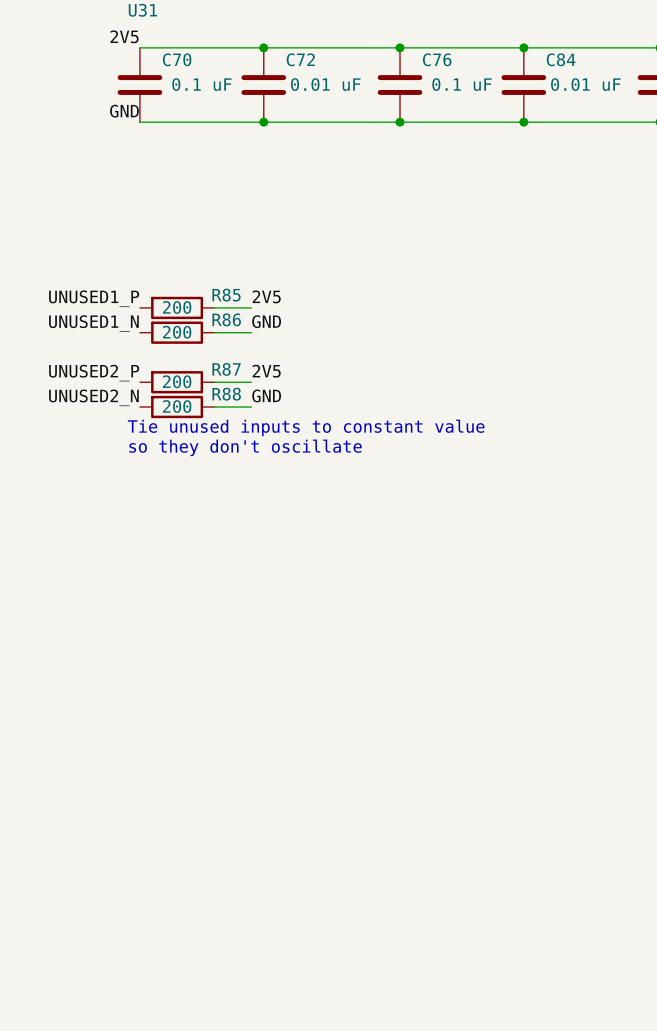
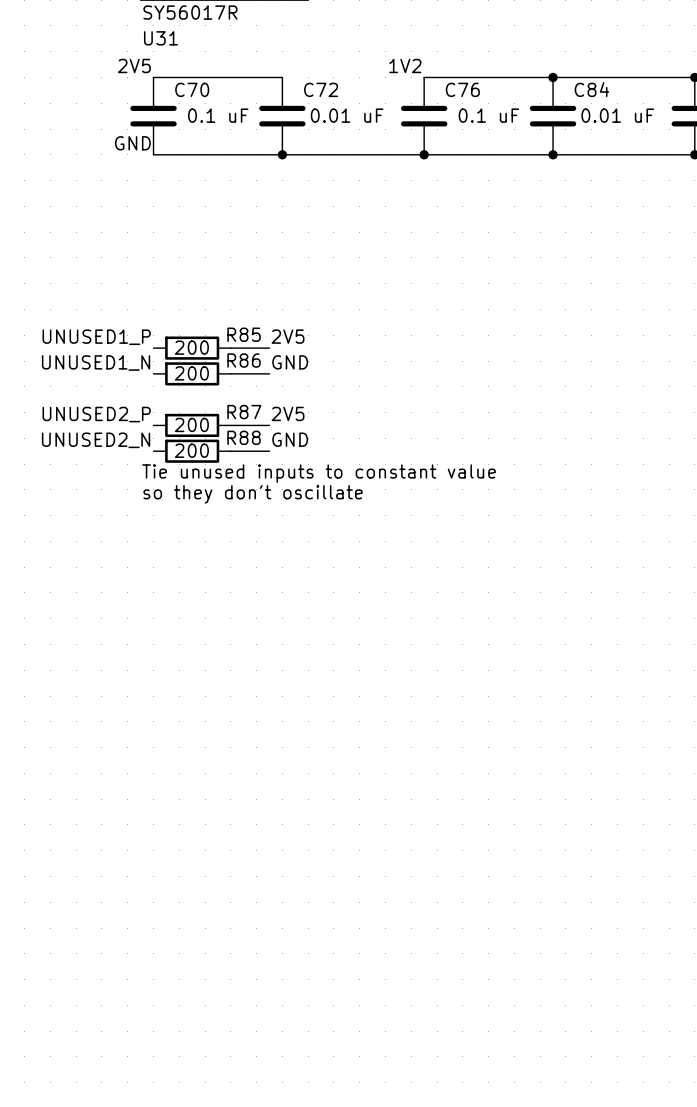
label: none -> 1V2 (405, 65)
wire: (263, 47) (400, 47) -> none
junction: (263, 47) -> none
junction: (400, 47) -> none

